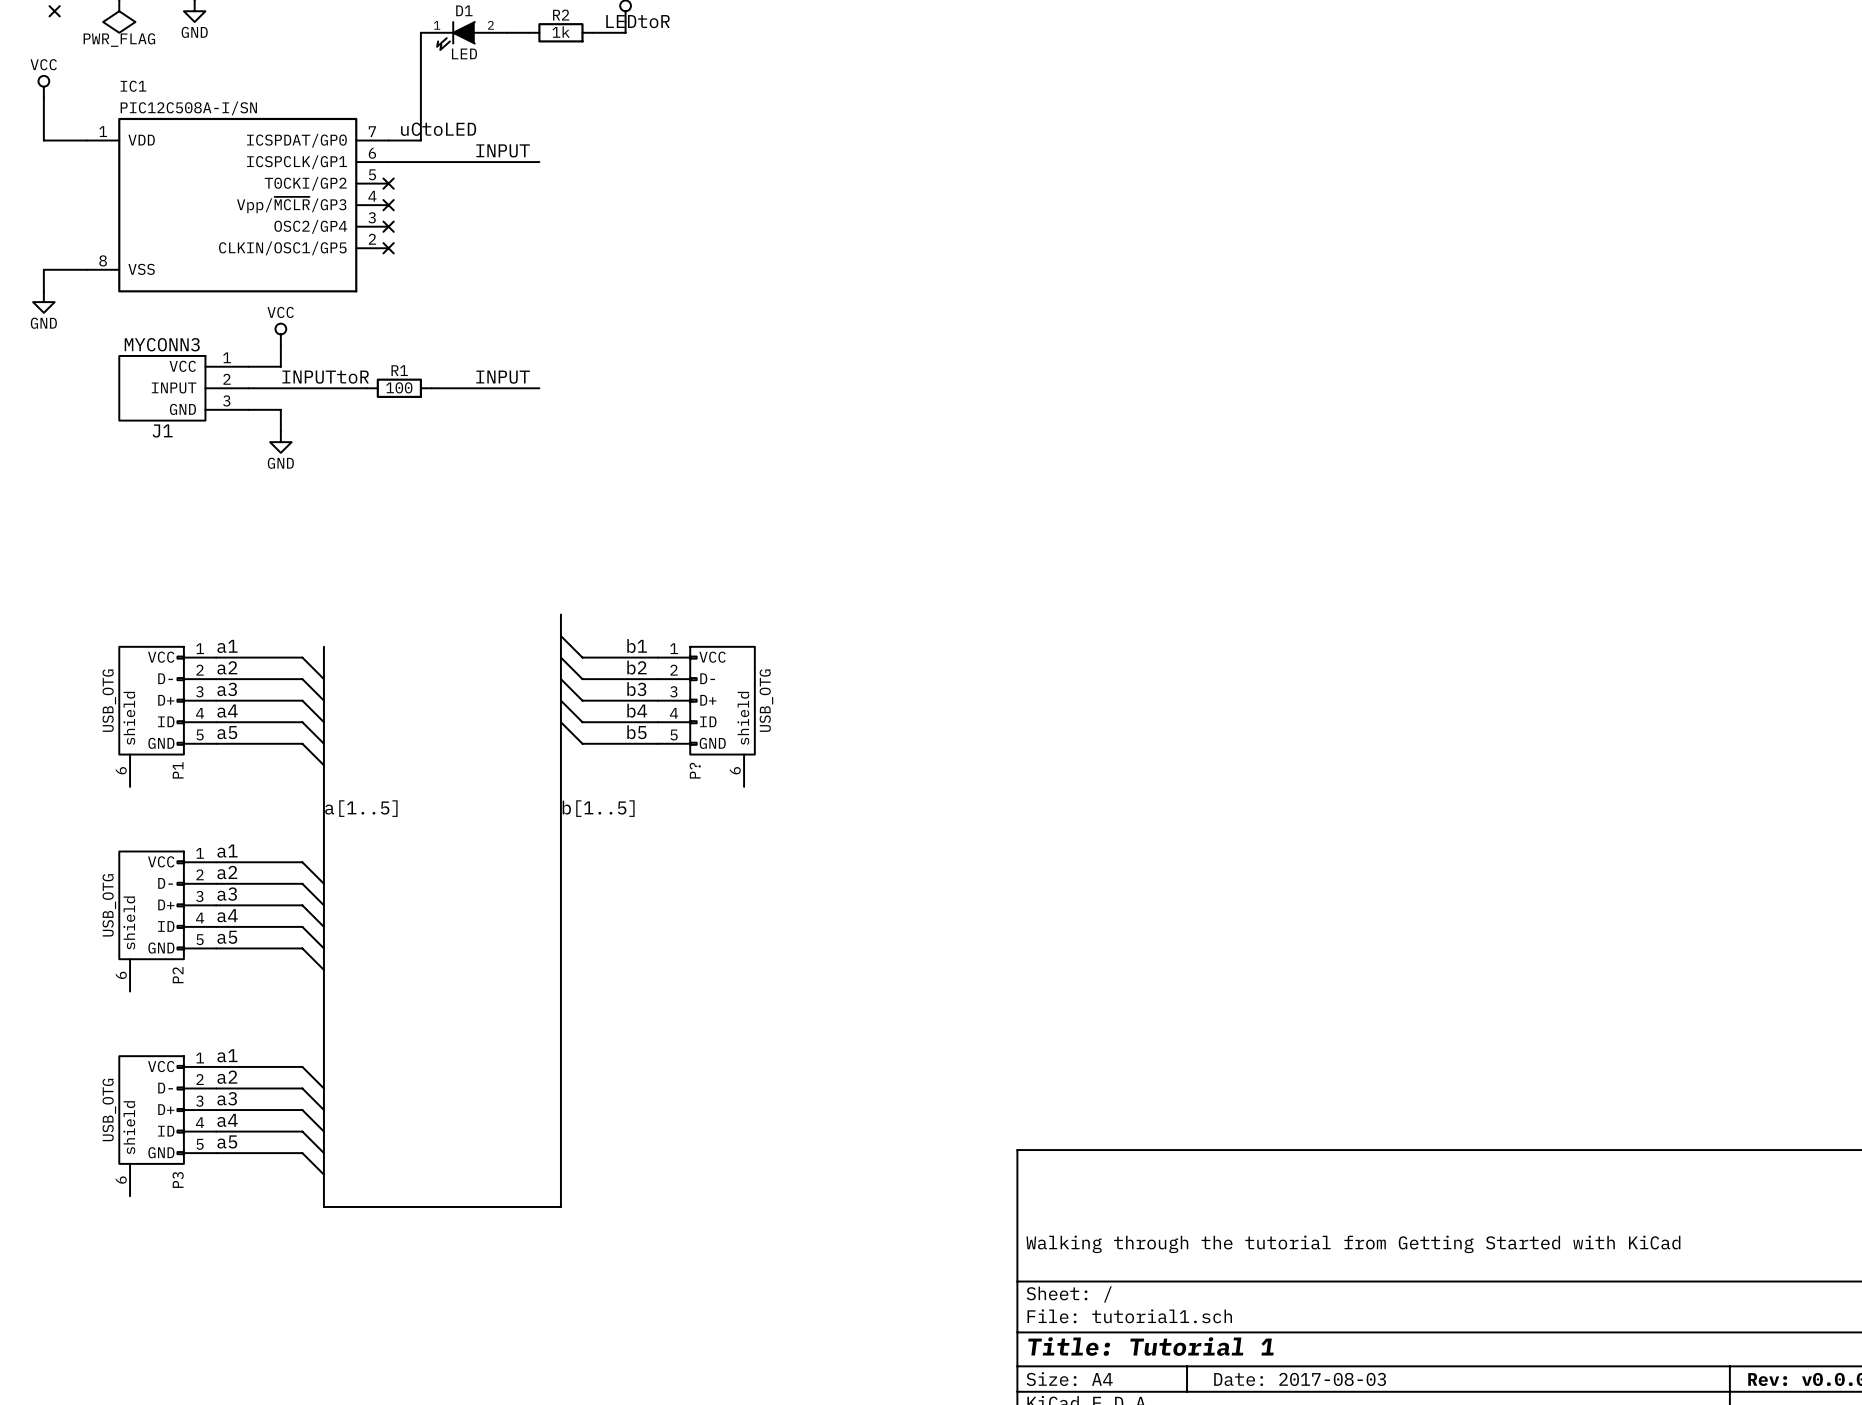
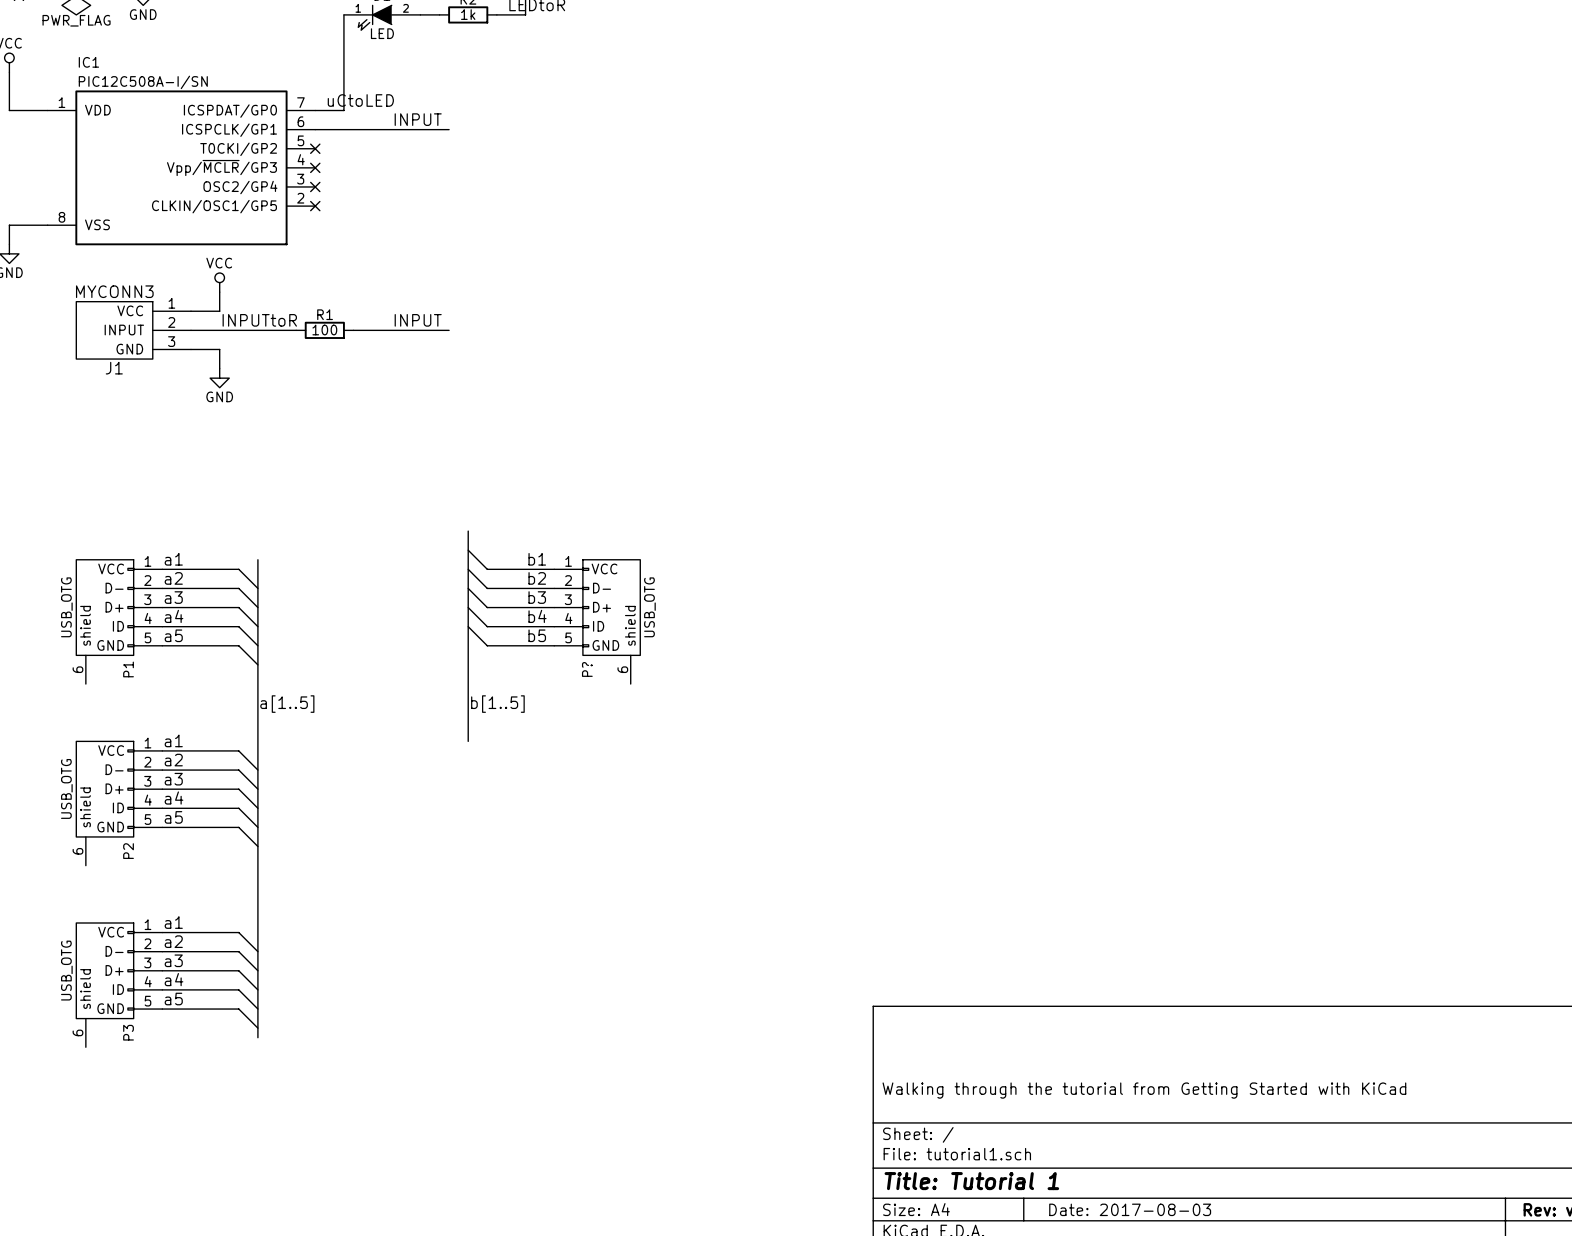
bus: (560, 851) (560, 1206) (323, 1206) (323, 1185) -> none

